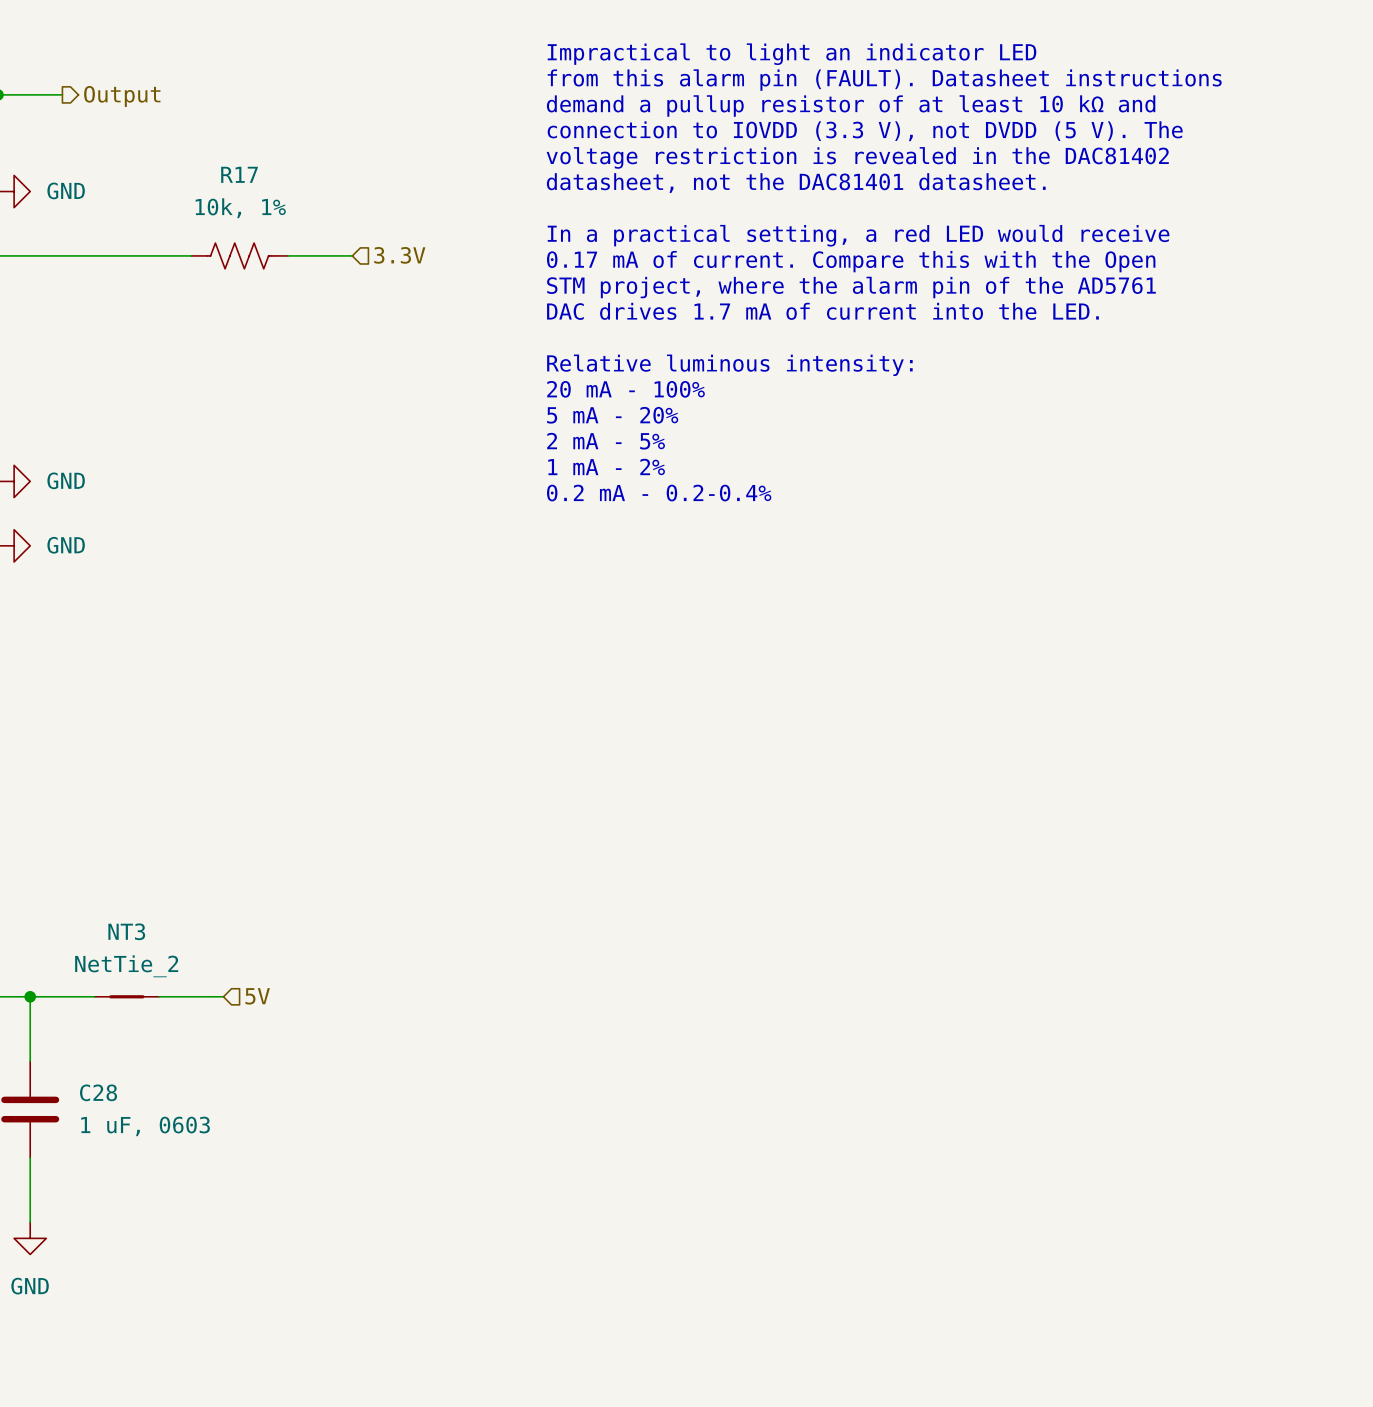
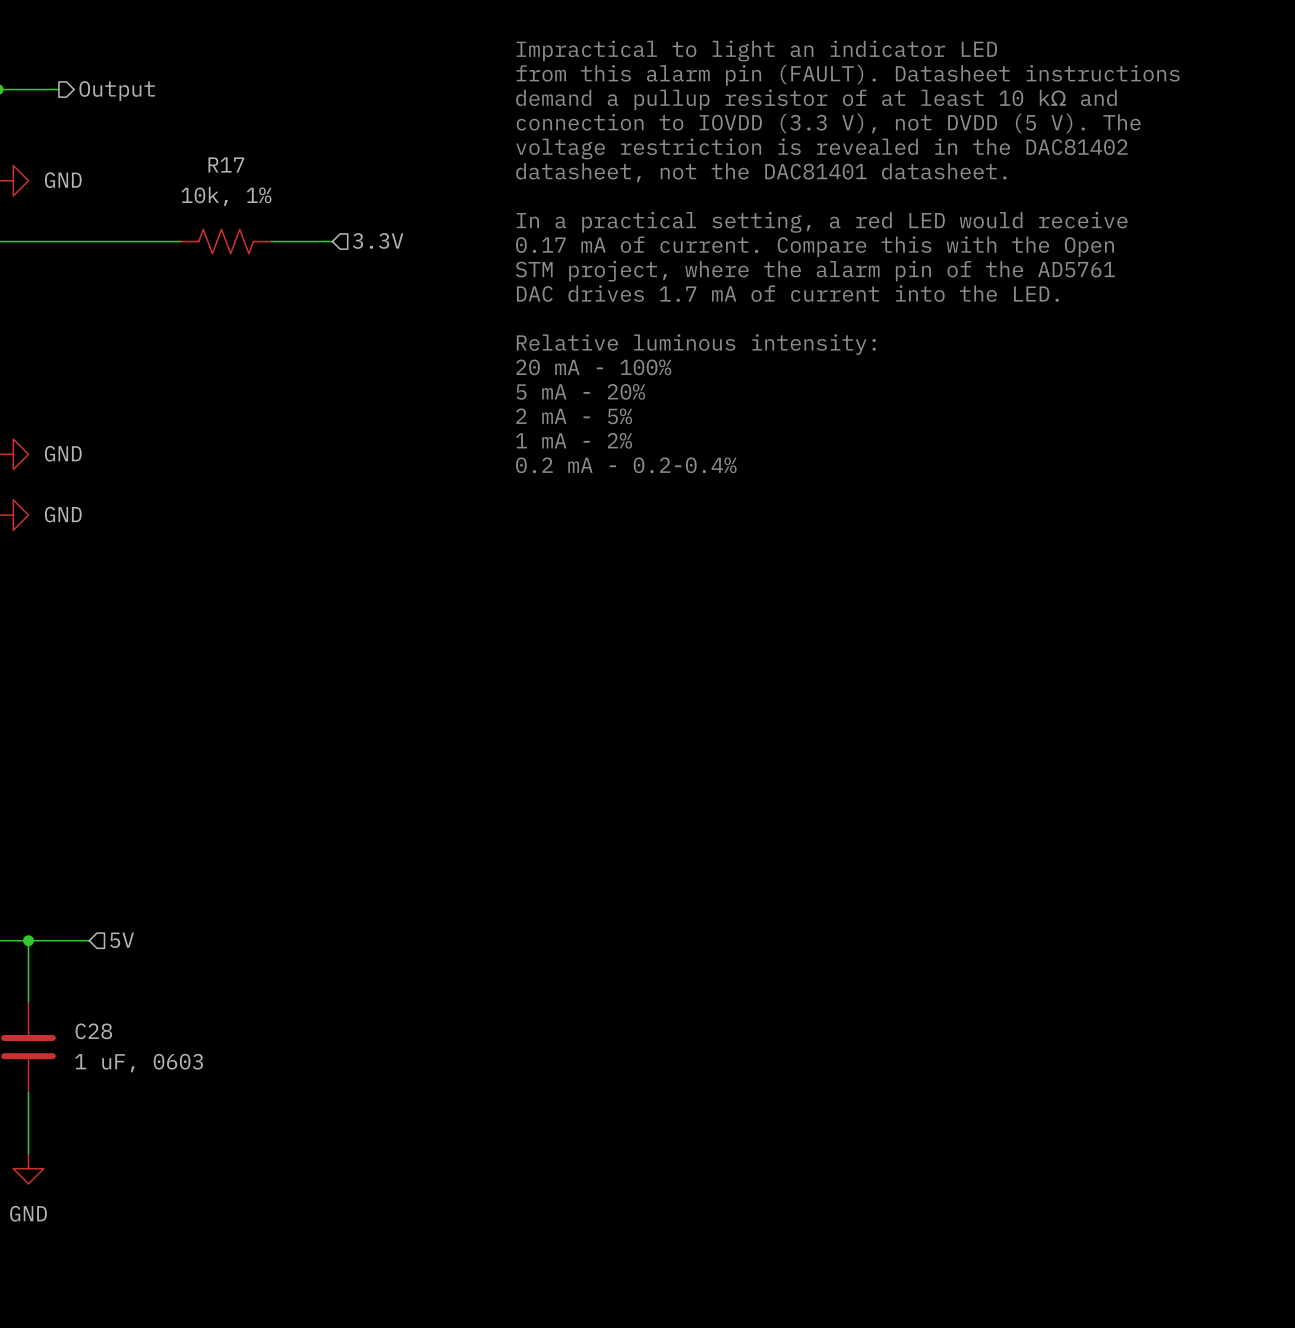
NT3: NetTie_2 (126, 996) -> none
wire: (159, 996) (223, 996) -> none
hierarchical label position: 5V (257, 996) -> 5V (122, 940)

